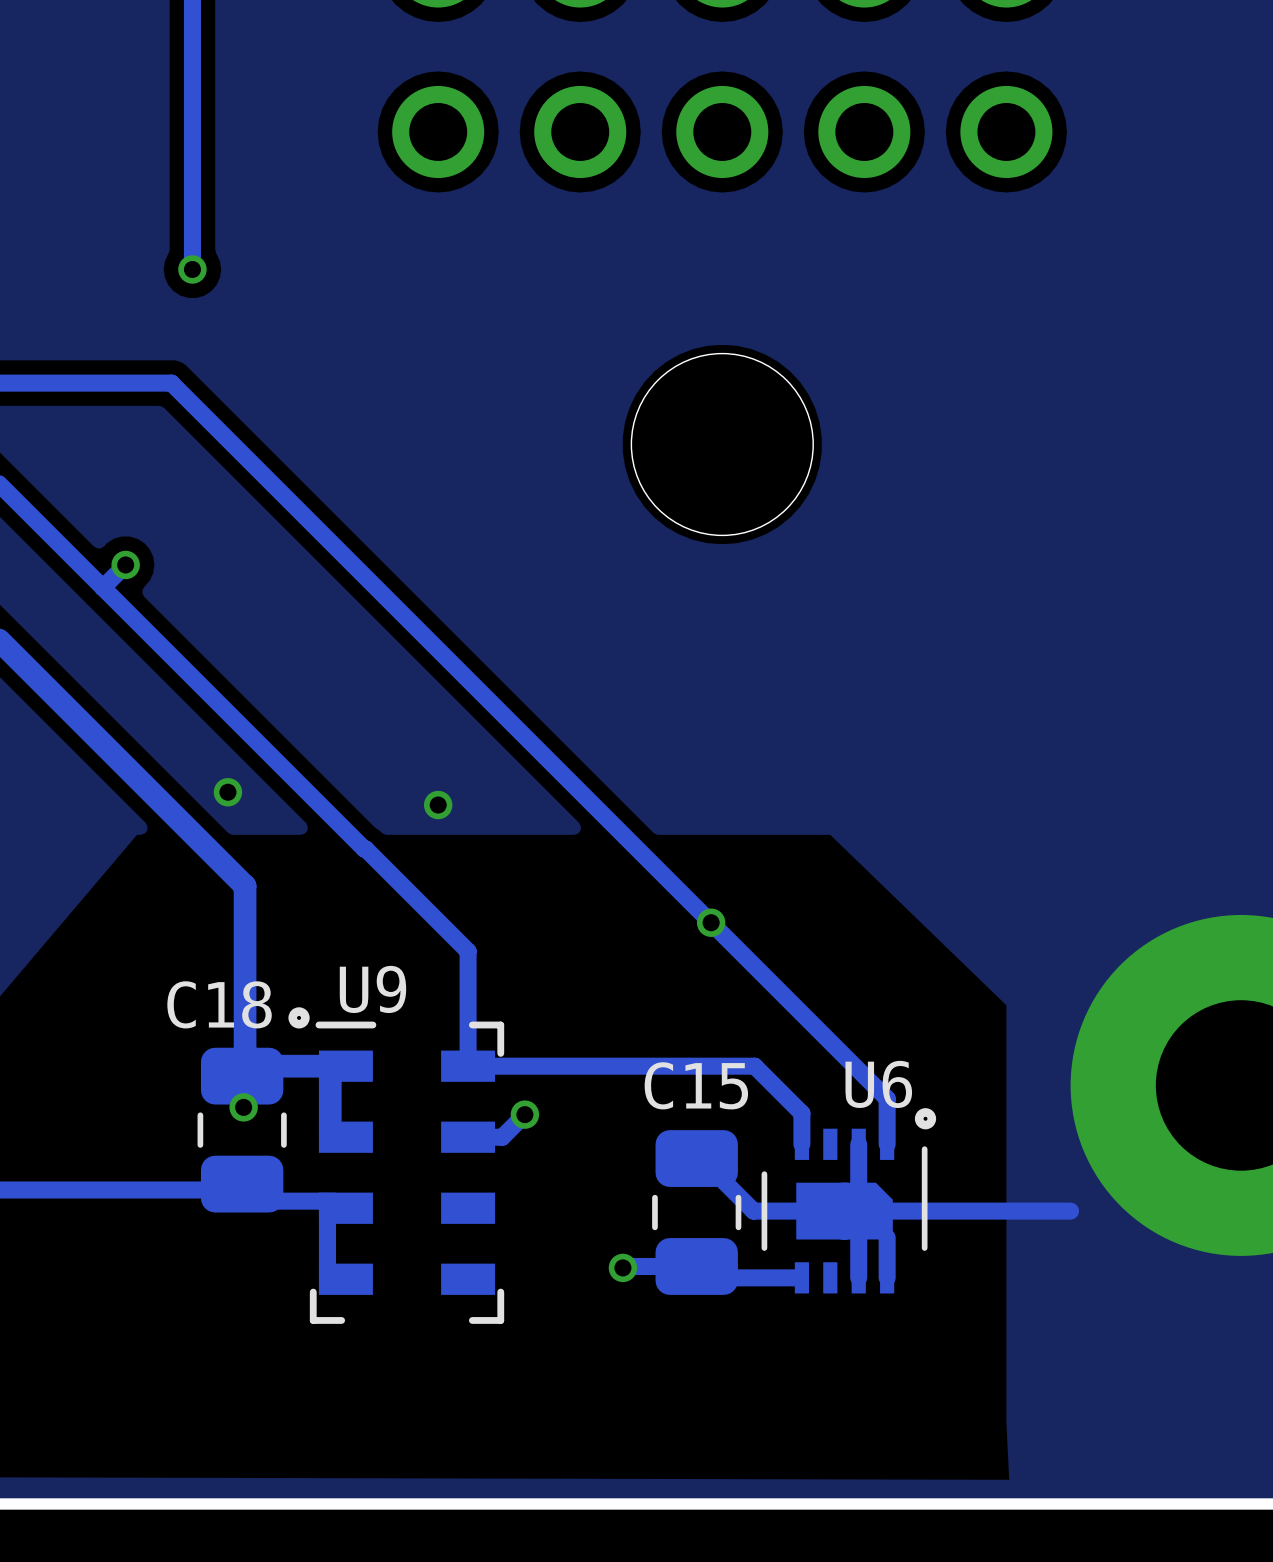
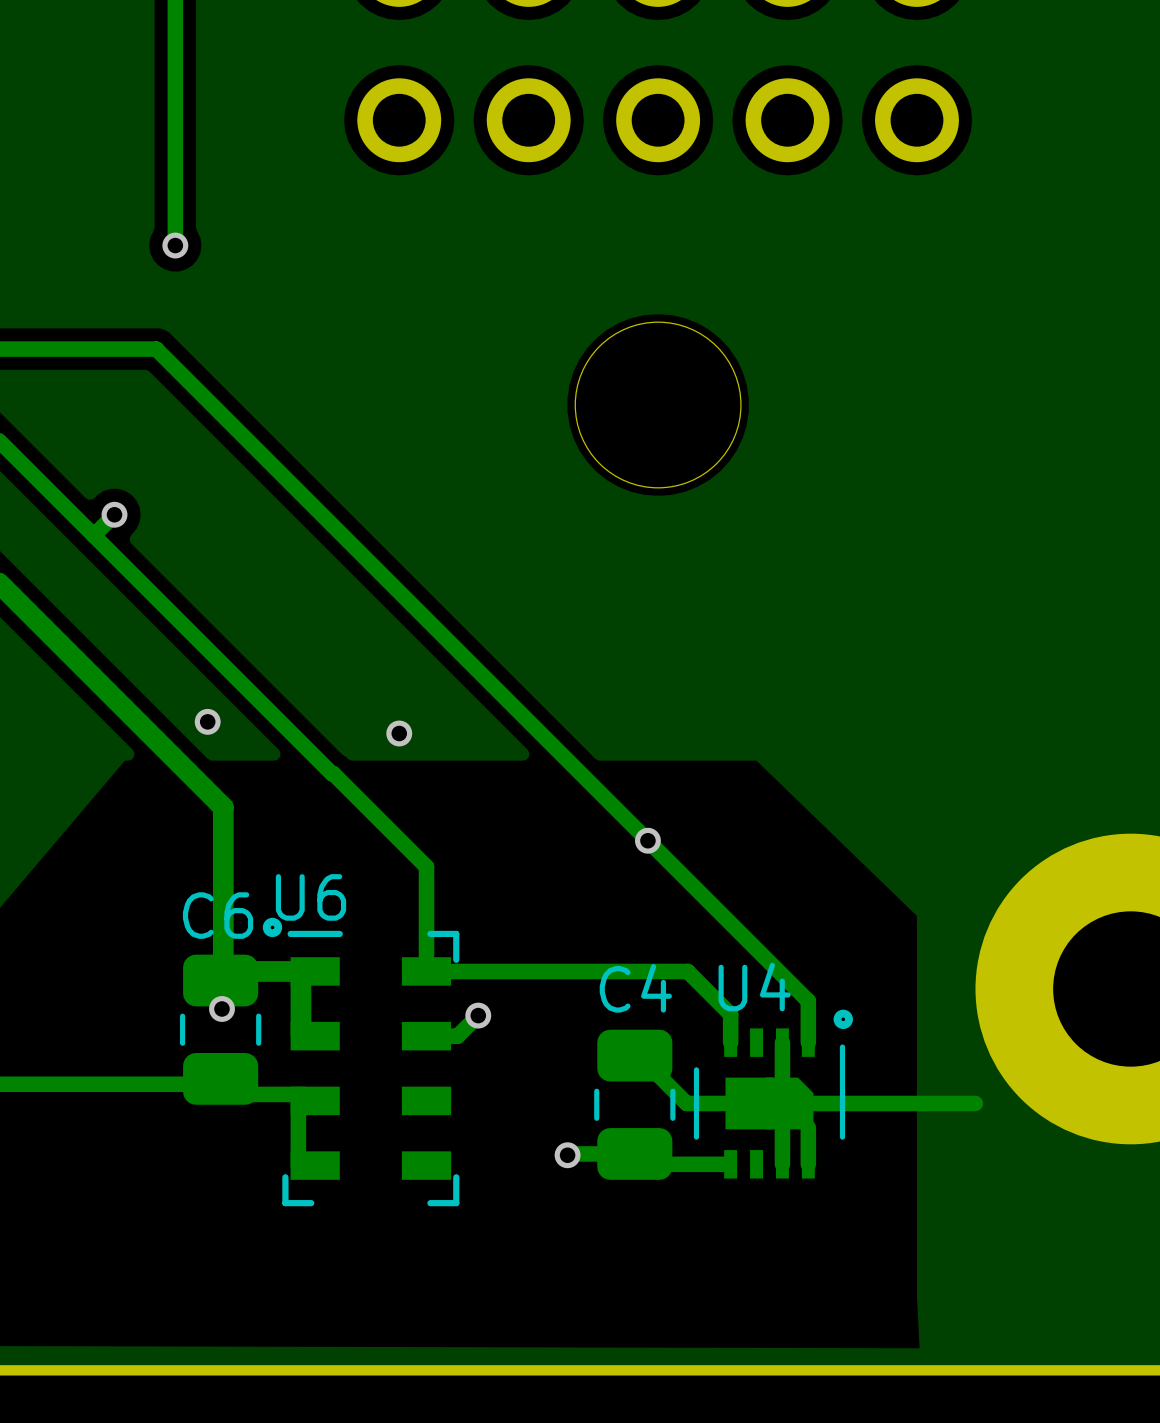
U9 name: U9 (372, 989) -> U6 (311, 897)
C18 name: C18 (219, 1004) -> C6 (218, 915)
U6 name: U6 (878, 1084) -> U4 (754, 987)
C15 name: C15 (696, 1085) -> C4 (635, 988)

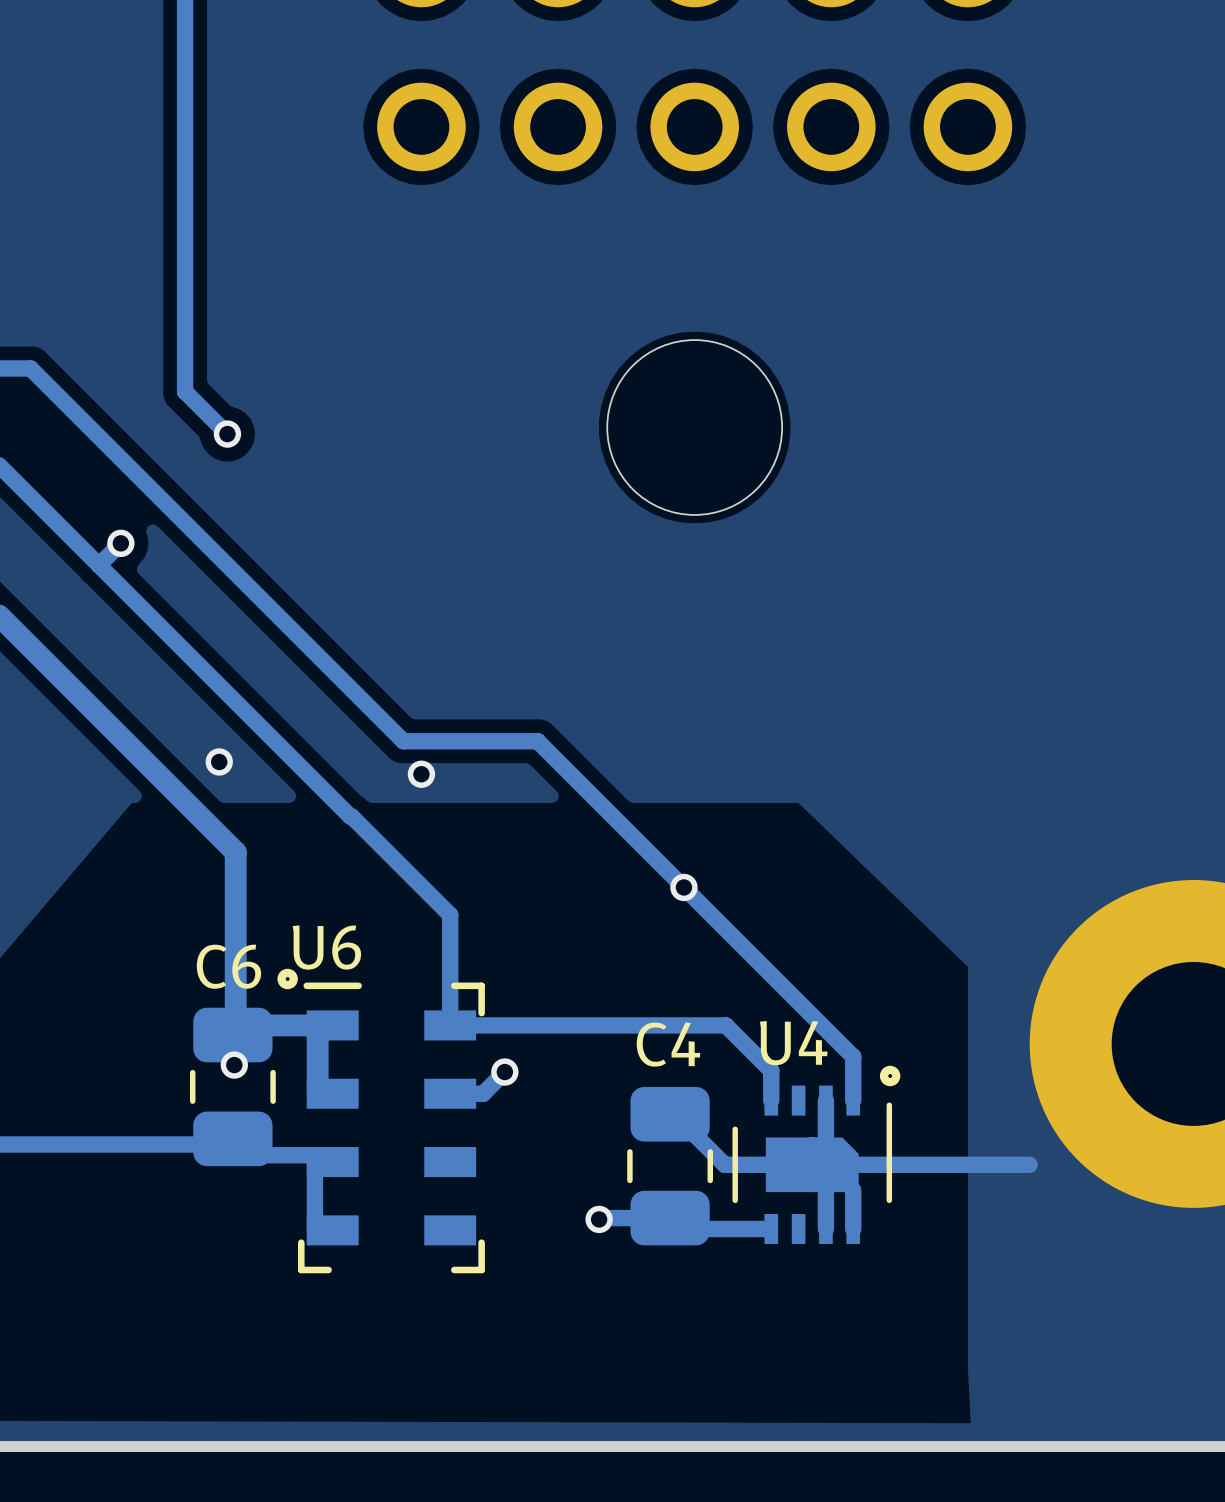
track: none -> (185, 259) (185, 391) (227, 434)
via position: (175, 245) -> (227, 434)
track: (29, 349) (156, 349) (509, 702) -> (30, 368) (403, 741) (537, 741)

